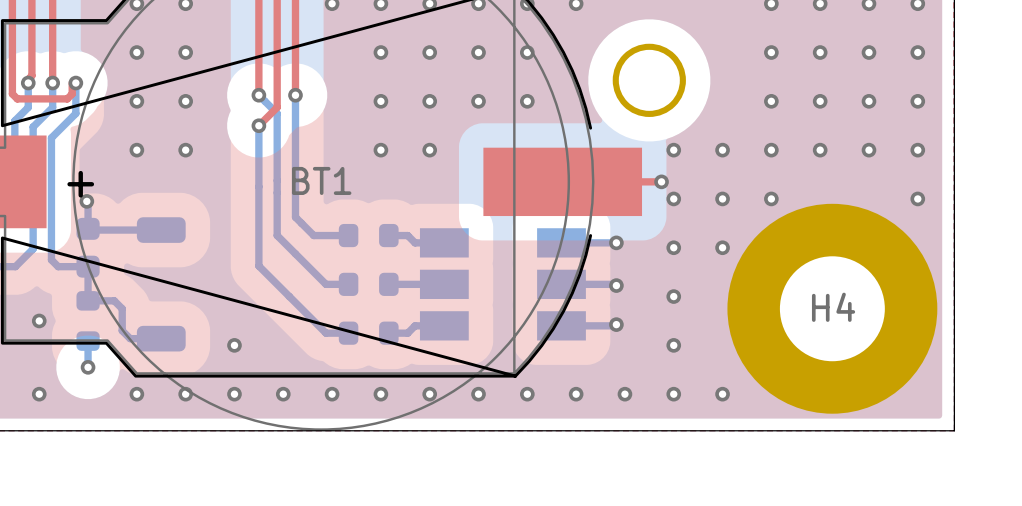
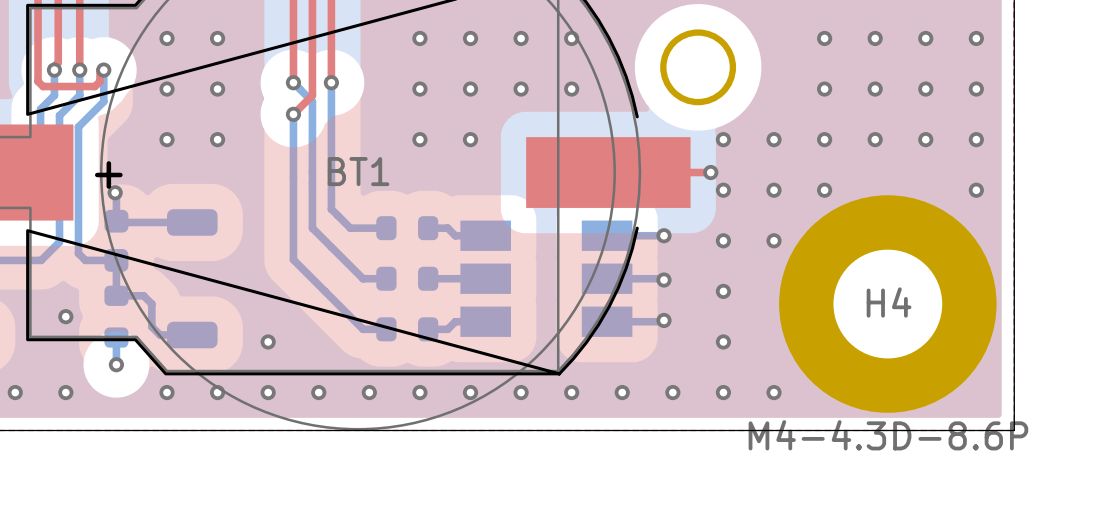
H4 value: none -> M4-4.3D-8.6P (888, 435)

